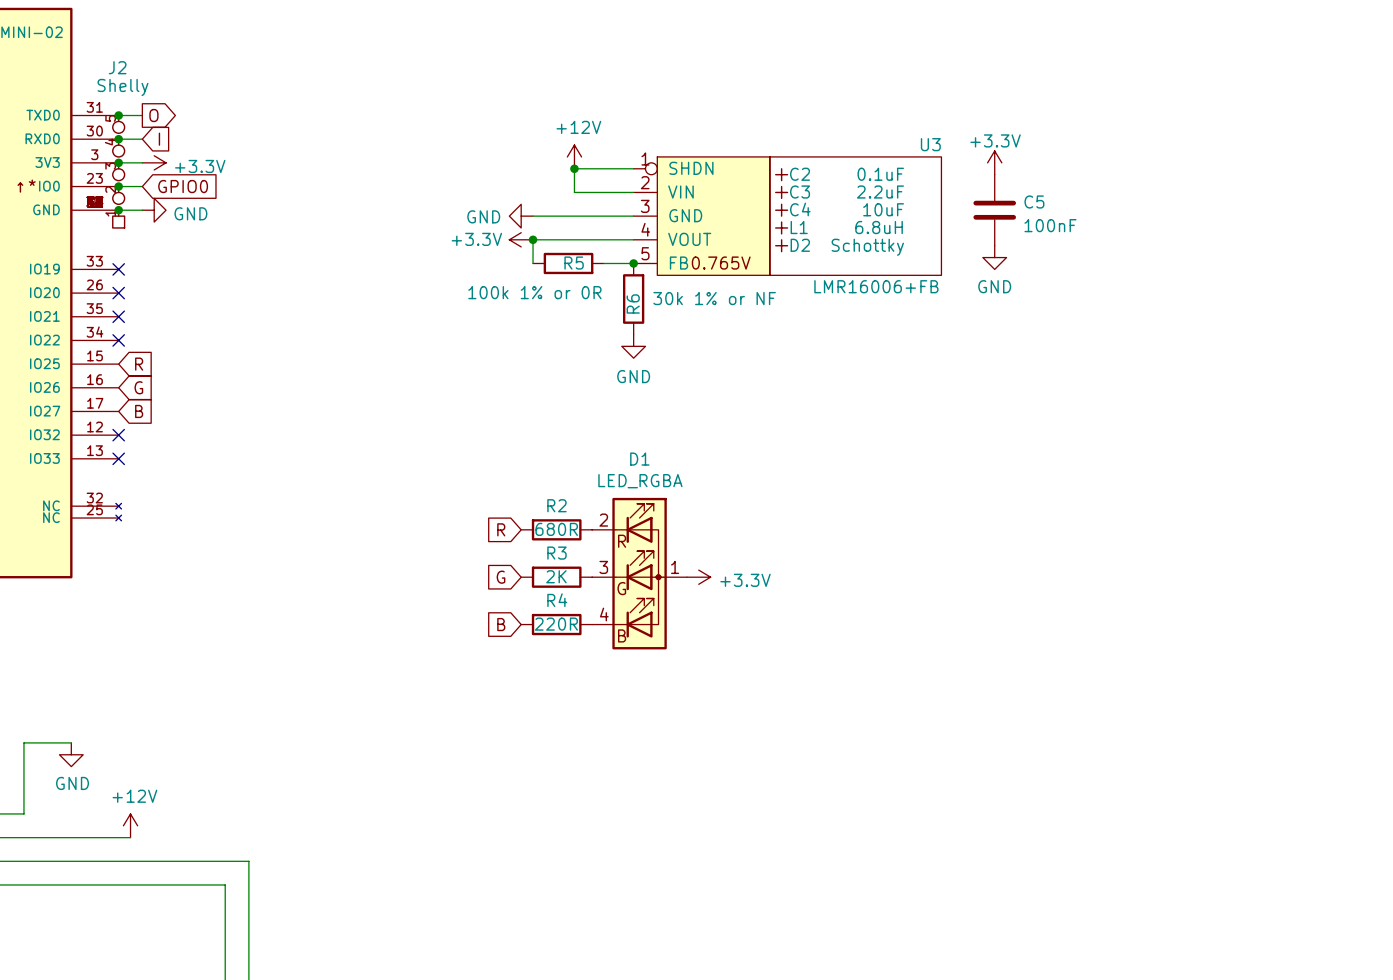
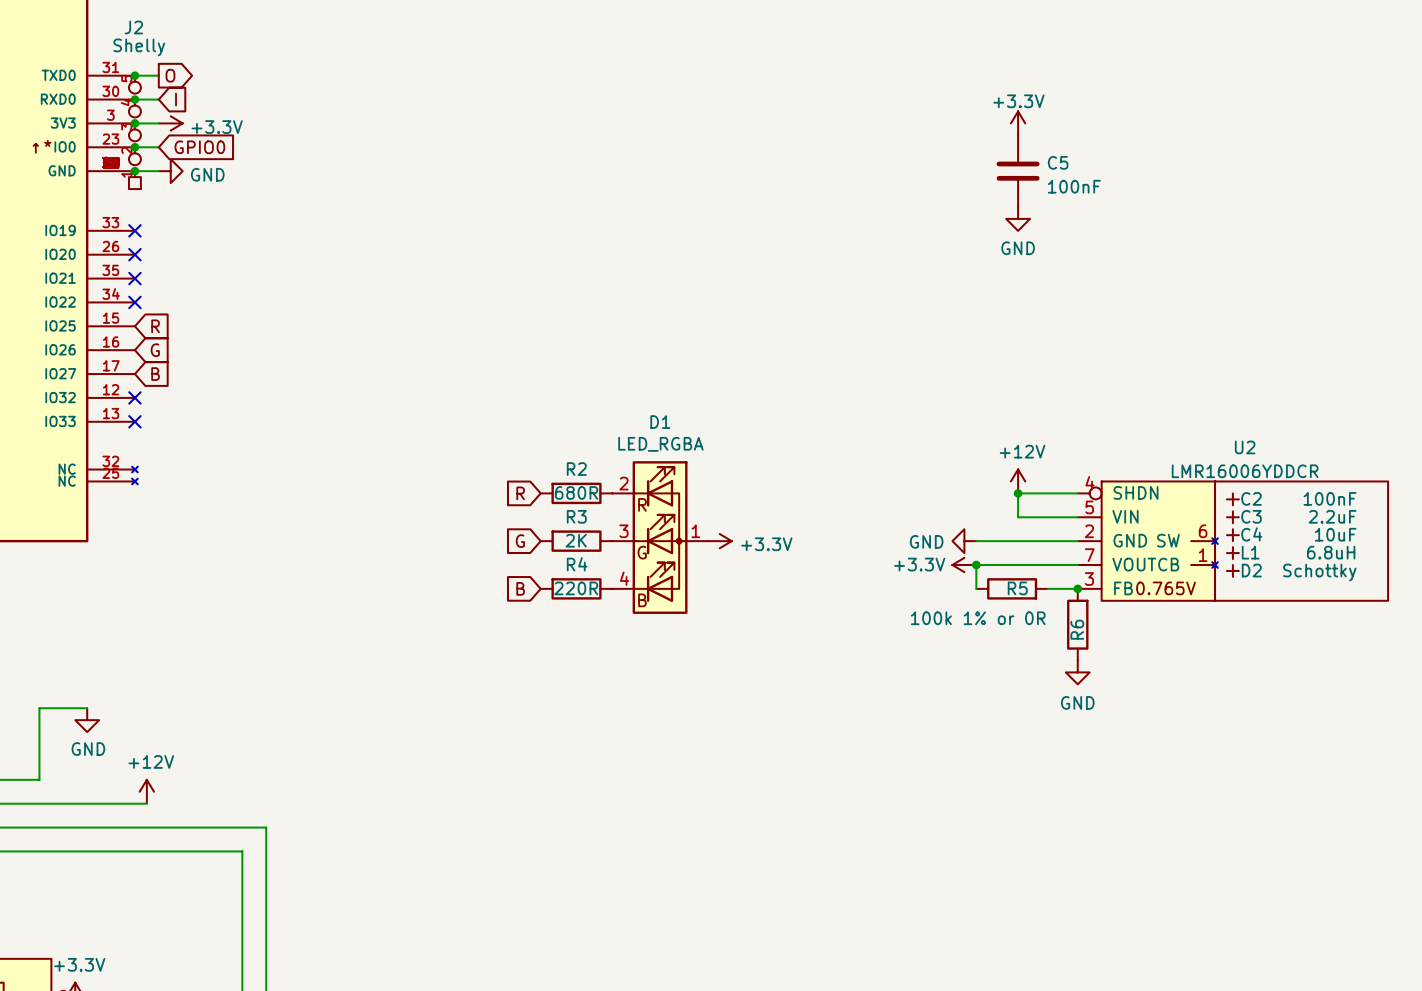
power symbol: +12V (574, 156) -> none
junction: (574, 168) -> none
wire: (633, 168) (574, 168) (574, 192) (633, 192) -> none
C2 position: (781, 174) -> (1232, 499)
C2 value: 0.1uF (880, 174) -> 100nF (1330, 498)
C3 position: (781, 192) -> (1232, 517)
C4 position: (781, 210) -> (1232, 535)
power symbol: GND (521, 216) -> none
wire: (533, 216) (633, 216) -> none
U3: LMR16006+FB (787, 216) -> none
L1 position: (781, 227) -> (1232, 553)
power symbol: +3.3V (521, 239) -> none
junction: (533, 239) -> none
wire: (633, 239) (533, 239) (533, 263) -> none
D2 position: (781, 245) -> (1232, 570)
R5 position: (568, 263) -> (1012, 588)
wire: (604, 263) (633, 263) -> none
junction: (633, 263) -> none
R6 value: 30k 1% or NF (714, 298) -> none
R6 position: (633, 299) -> (1077, 624)
power symbol: GND (633, 346) -> none
power symbol: none -> +12V (1018, 481)
junction: none -> (1018, 493)
wire: none -> (1077, 493) (1018, 493) (1018, 517) (1077, 517)
power symbol: none -> GND (964, 541)
wire: none -> (976, 541) (1077, 541)
U2: none -> LMR16006YDDCR (1232, 541)
power symbol: none -> +3.3V (964, 565)
junction: none -> (976, 565)
wire: none -> (1077, 565) (976, 565) (976, 588)
wire: none -> (1047, 588) (1077, 588)
junction: none -> (1077, 588)
power symbol: none -> GND (1077, 672)

